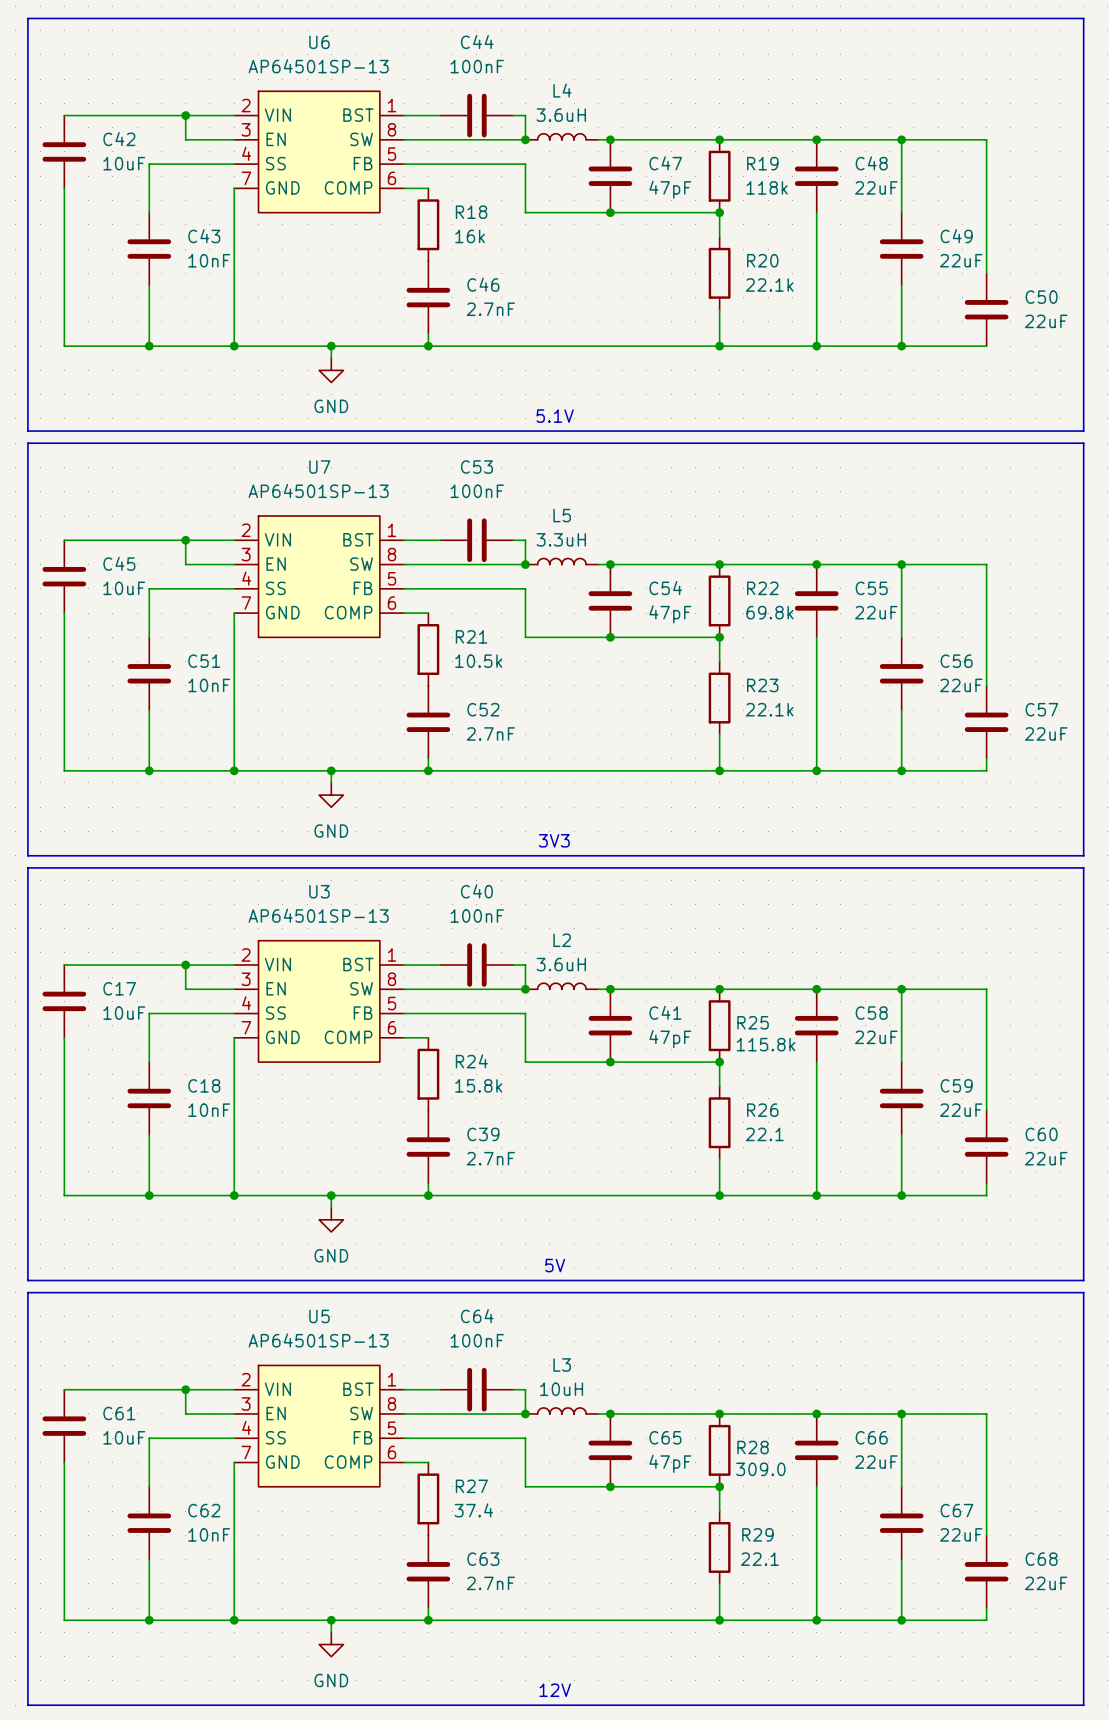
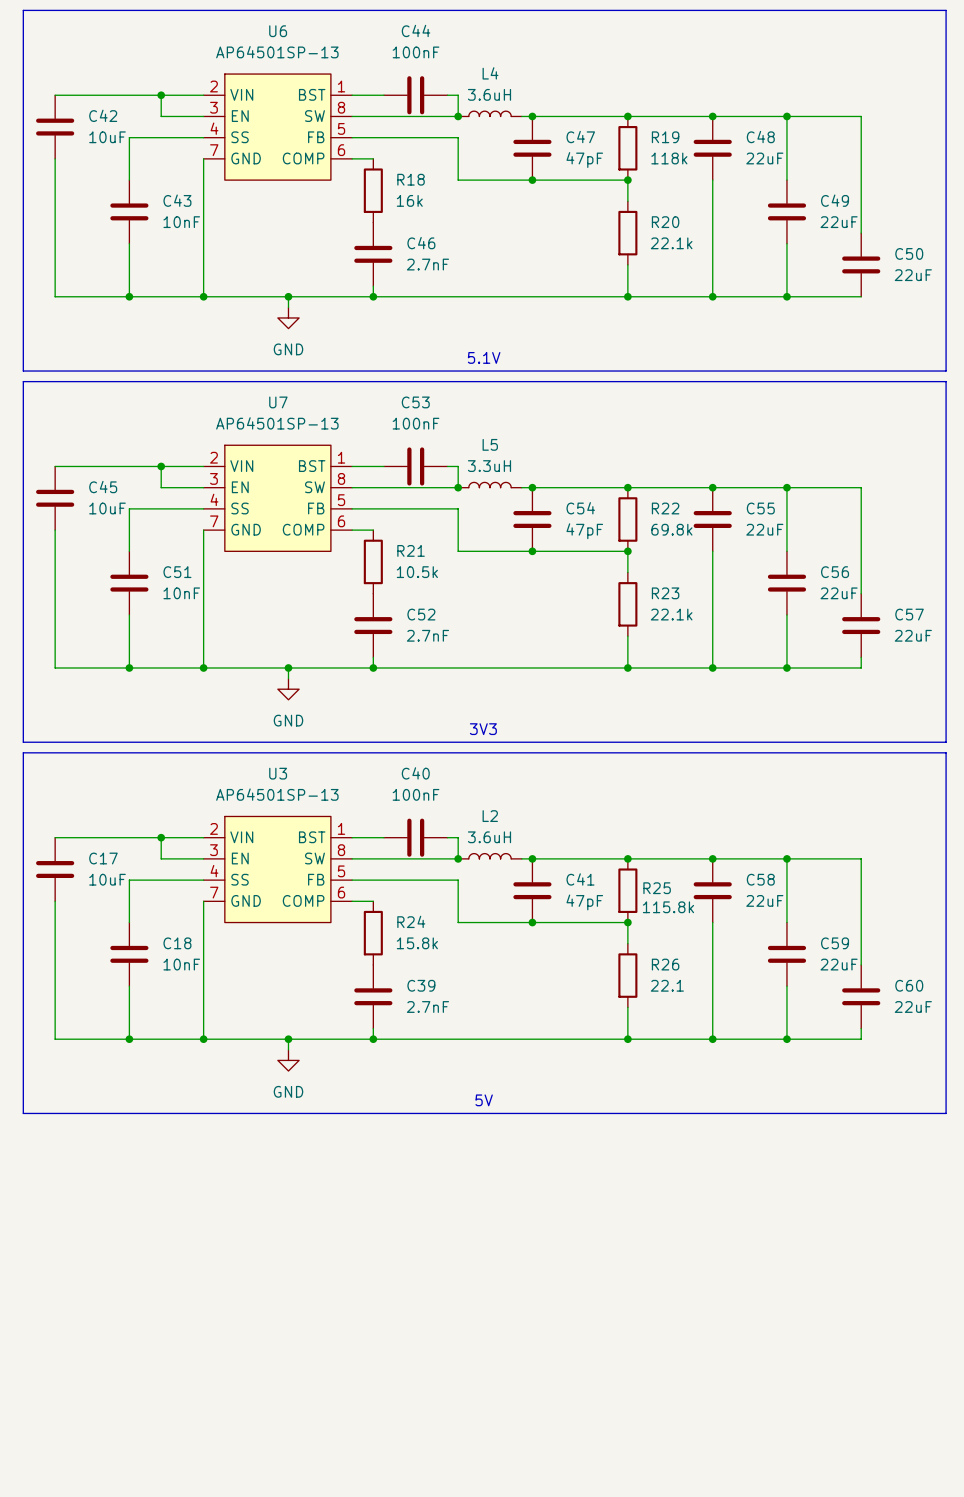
line: (27, 1292) (1083, 1292) (1083, 1705) (27, 1705) (27, 1292) -> none
wire: (64, 1389) (234, 1389) -> none
wire: (185, 1389) (185, 1413) (234, 1413) -> none
junction: (185, 1389) -> none
wire: (404, 1389) (440, 1389) -> none
C64: 100nF (476, 1389) -> none
wire: (513, 1389) (525, 1389) (525, 1413) (404, 1413) -> none
L3: 10uH (561, 1410) -> none
junction: (525, 1413) -> none
wire: (598, 1413) (986, 1413) (986, 1535) -> none
junction: (610, 1413) -> none
junction: (719, 1413) -> none
junction: (816, 1413) -> none
wire: (901, 1413) (901, 1486) -> none
junction: (901, 1413) -> none
C61: 10uF (64, 1426) -> none
U5: AP64501SP-13 (319, 1426) -> none
wire: (234, 1438) (149, 1438) (149, 1486) -> none
wire: (404, 1438) (525, 1438) (525, 1486) (719, 1486) (719, 1511) -> none
C65: 47pF (610, 1450) -> none
R28: 309.0 (719, 1450) -> none
C66: 22uF (816, 1450) -> none
wire: (64, 1462) (64, 1620) (986, 1620) (986, 1608) -> none
wire: (234, 1462) (234, 1620) -> none
wire: (404, 1462) (428, 1462) -> none
junction: (610, 1486) -> none
junction: (719, 1486) -> none
wire: (816, 1486) (816, 1620) -> none
R27: 37.4 (428, 1498) -> none
C62: 10nF (149, 1523) -> none
C67: 22uF (901, 1523) -> none
R29: 22.1 (719, 1547) -> none
wire: (149, 1559) (149, 1620) -> none
wire: (901, 1559) (901, 1620) -> none
C63: 2.7nF (428, 1571) -> none
C68: 22uF (986, 1571) -> none
wire: (719, 1583) (719, 1620) -> none
wire: (428, 1608) (428, 1620) -> none
junction: (149, 1620) -> none
junction: (234, 1620) -> none
wire: (331, 1620) (331, 1632) -> none
junction: (331, 1620) -> none
junction: (428, 1620) -> none
junction: (719, 1620) -> none
junction: (816, 1620) -> none
junction: (901, 1620) -> none
power symbol: GND (331, 1644) -> none
text: 12V (555, 1690) -> none

